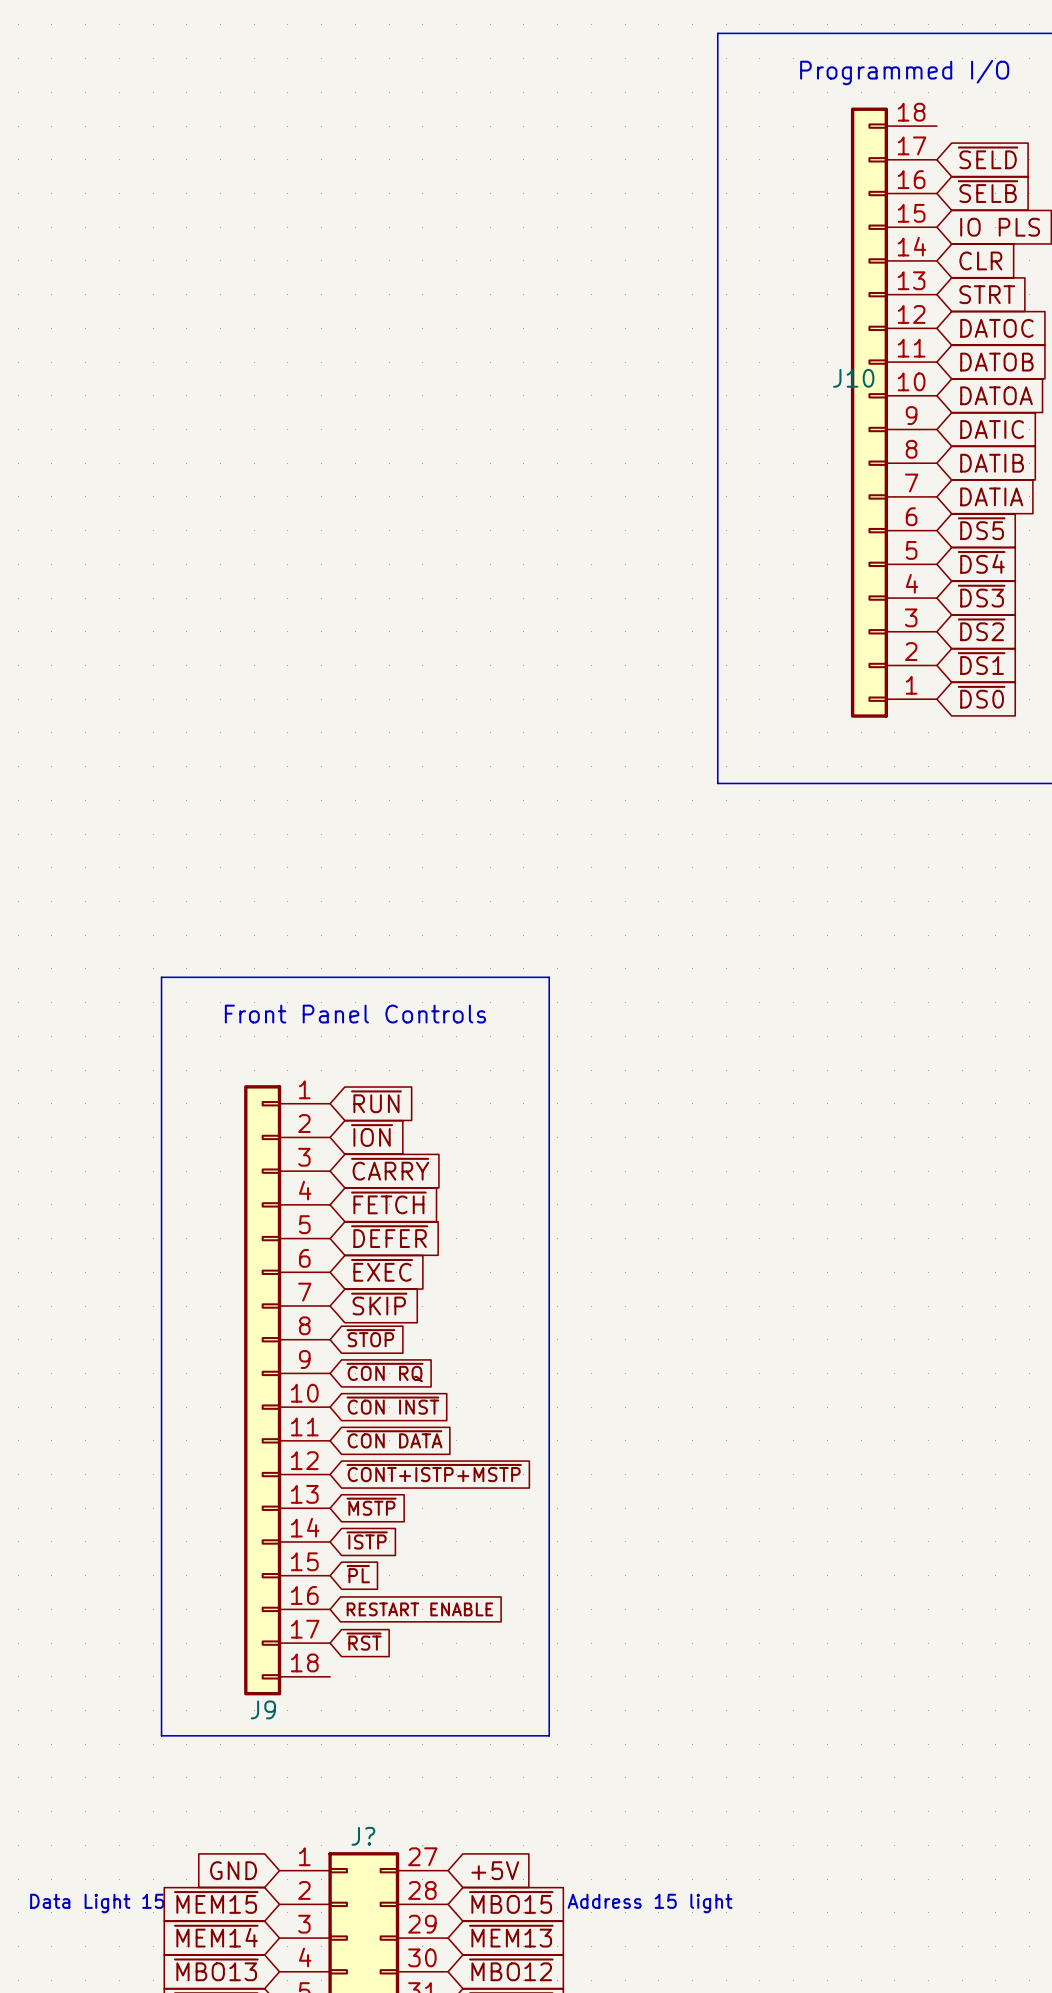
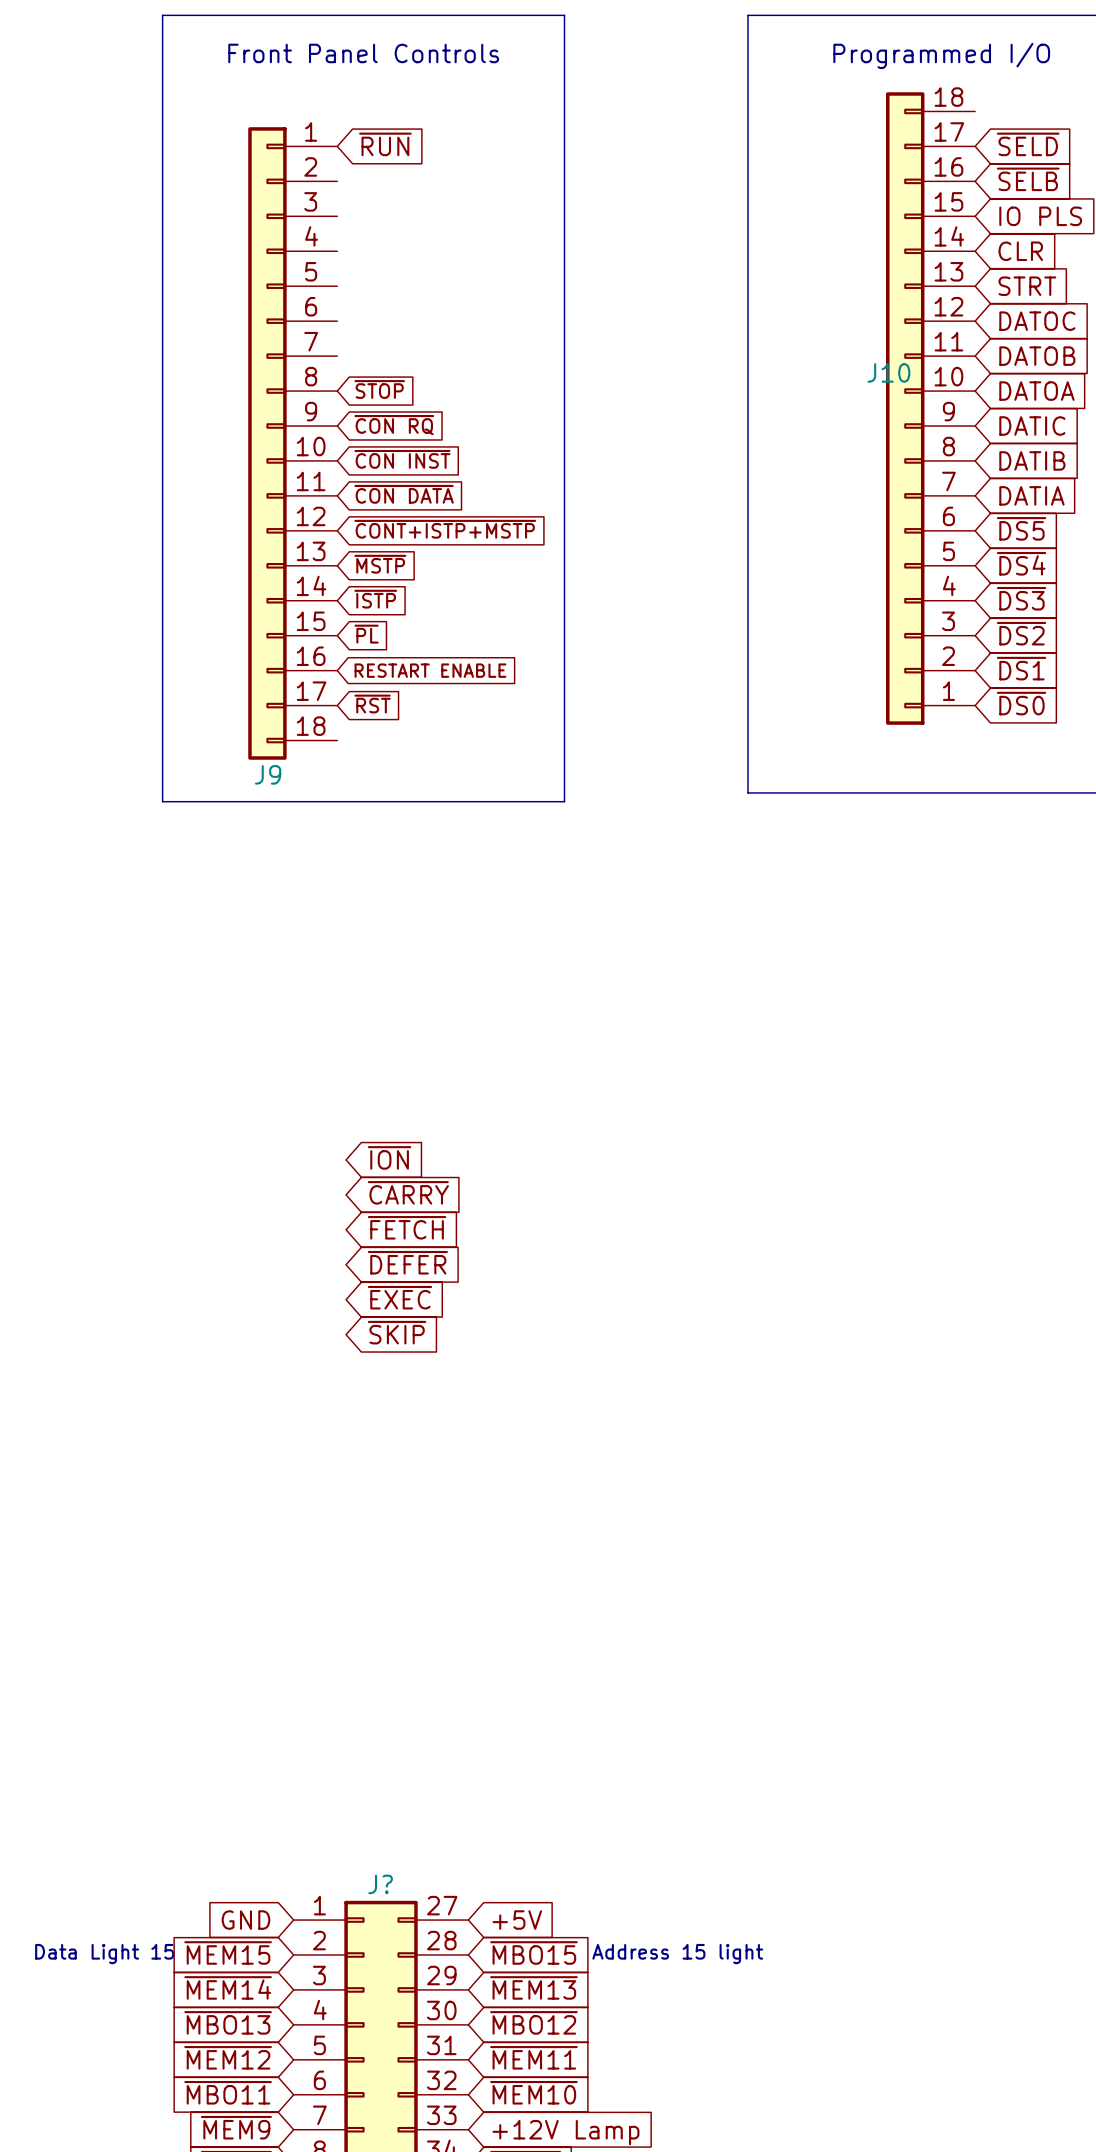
line: none -> (162, 15) (564, 15) (564, 801) (162, 801) (162, 15)
text: none -> Front Panel Controls (363, 53)
global label: none -> ~{RUN} (385, 144)
global label: none -> ~{STOP} (379, 389)
global label: none -> ~{CON RQ} (394, 425)
global label: none -> ~{CON INST} (402, 459)
global label: none -> ~{CON DATA} (404, 494)
global label: none -> ~{CONT+ISTP+MSTP} (445, 529)
global label: none -> ~{MSTP} (380, 564)
global label: none -> ~{ISTP} (375, 599)
global label: none -> ~{PL} (366, 634)
global label: none -> RESTART ENABLE (430, 670)
global label: none -> ~{RST} (372, 704)
line: (161, 977) (549, 977) (549, 1735) (161, 1735) (161, 977) -> none
text: Front Panel Controls (355, 1014) -> none
global label: ~{RUN} (376, 1101) -> none
global label: ~{STOP} (370, 1338) -> none
global label: ~{CON RQ} (385, 1372) -> none
J9 position: (287, 1390) -> (292, 443)
global label: ~{CON INST} (392, 1405) -> none
global label: ~{CON DATA} (394, 1439) -> none
global label: ~{CONT+ISTP+MSTP} (434, 1473) -> none
global label: ~{MSTP} (371, 1506) -> none
global label: ~{ISTP} (367, 1540) -> none
global label: ~{PL} (358, 1574) -> none
global label: RESTART ENABLE (419, 1609) -> none
global label: ~{RST} (364, 1641) -> none

